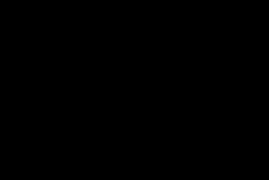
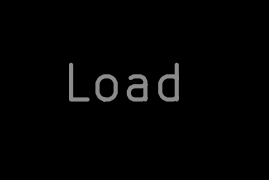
text: none -> Load (123, 82)

